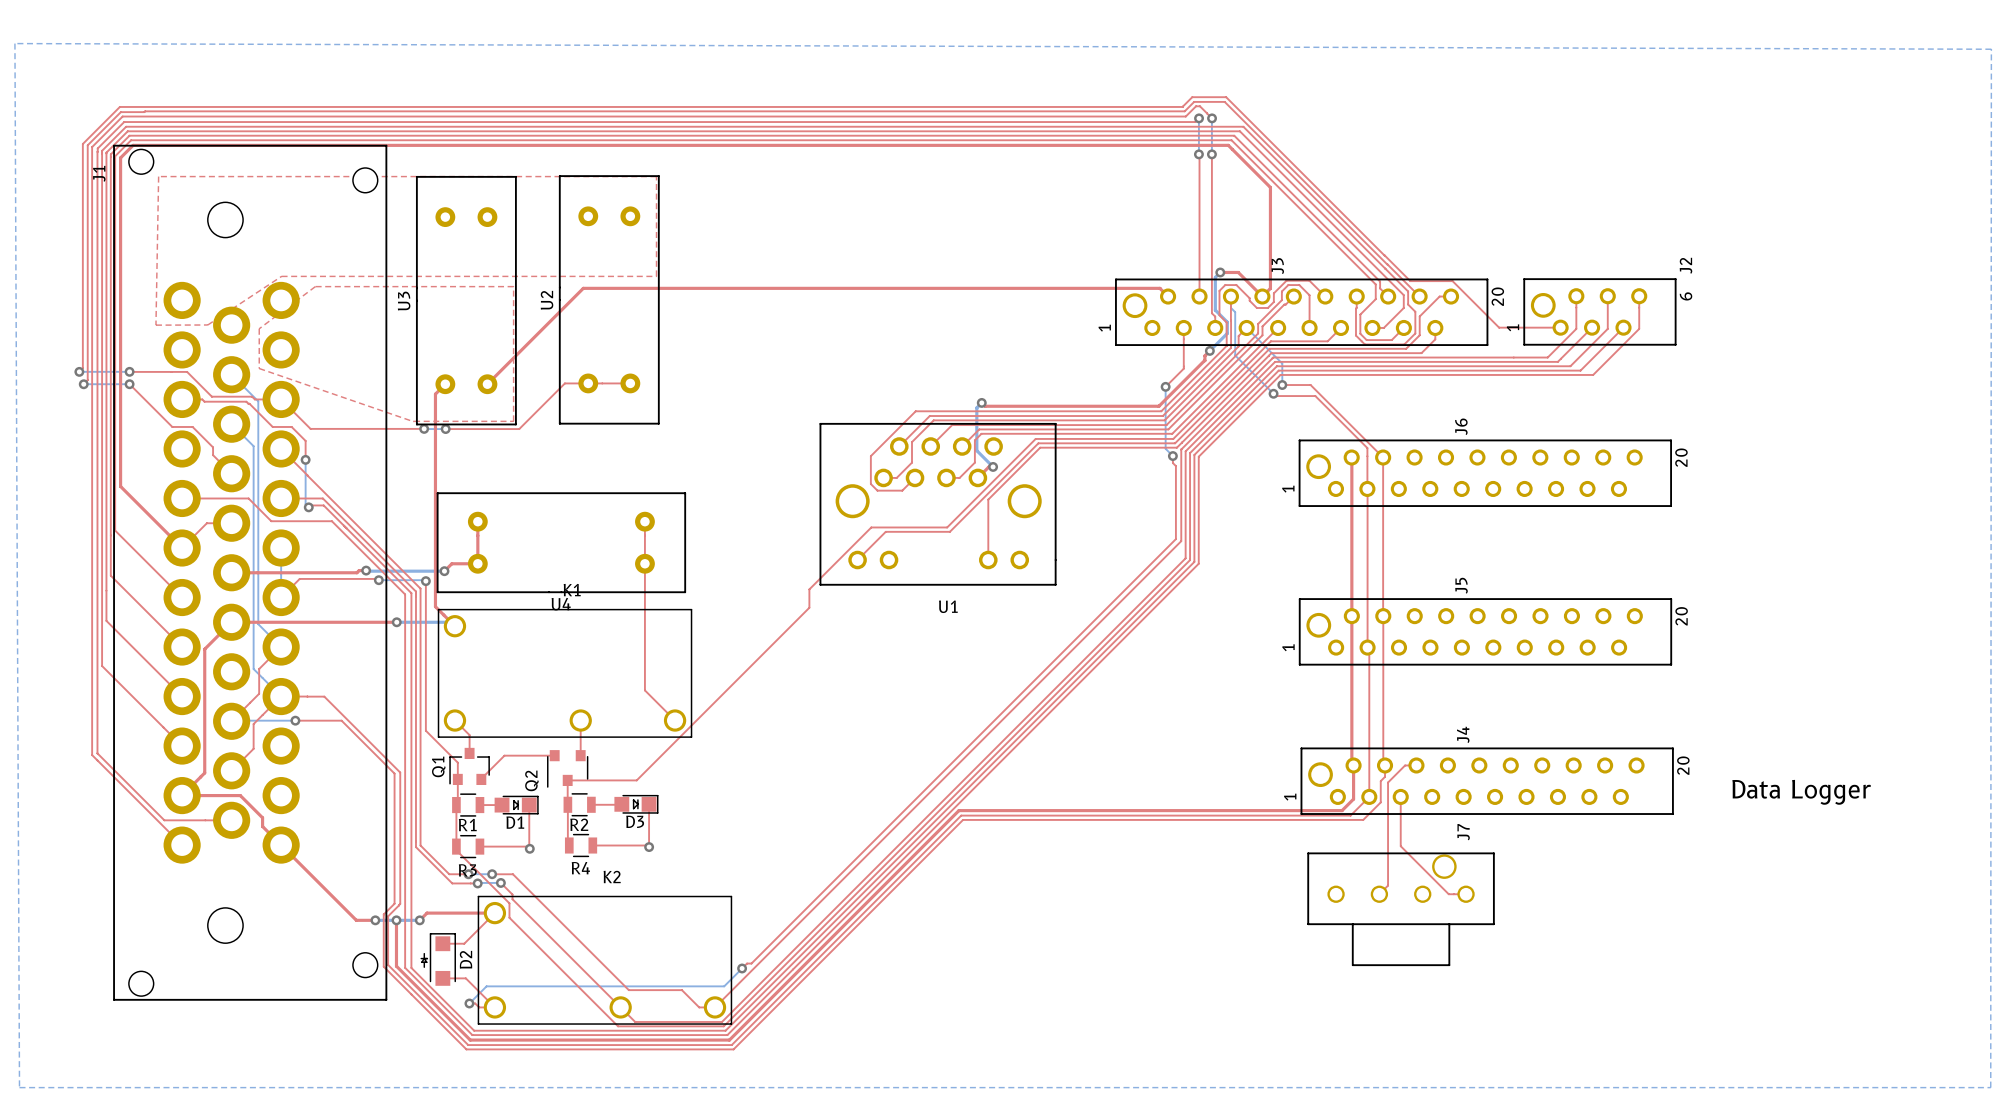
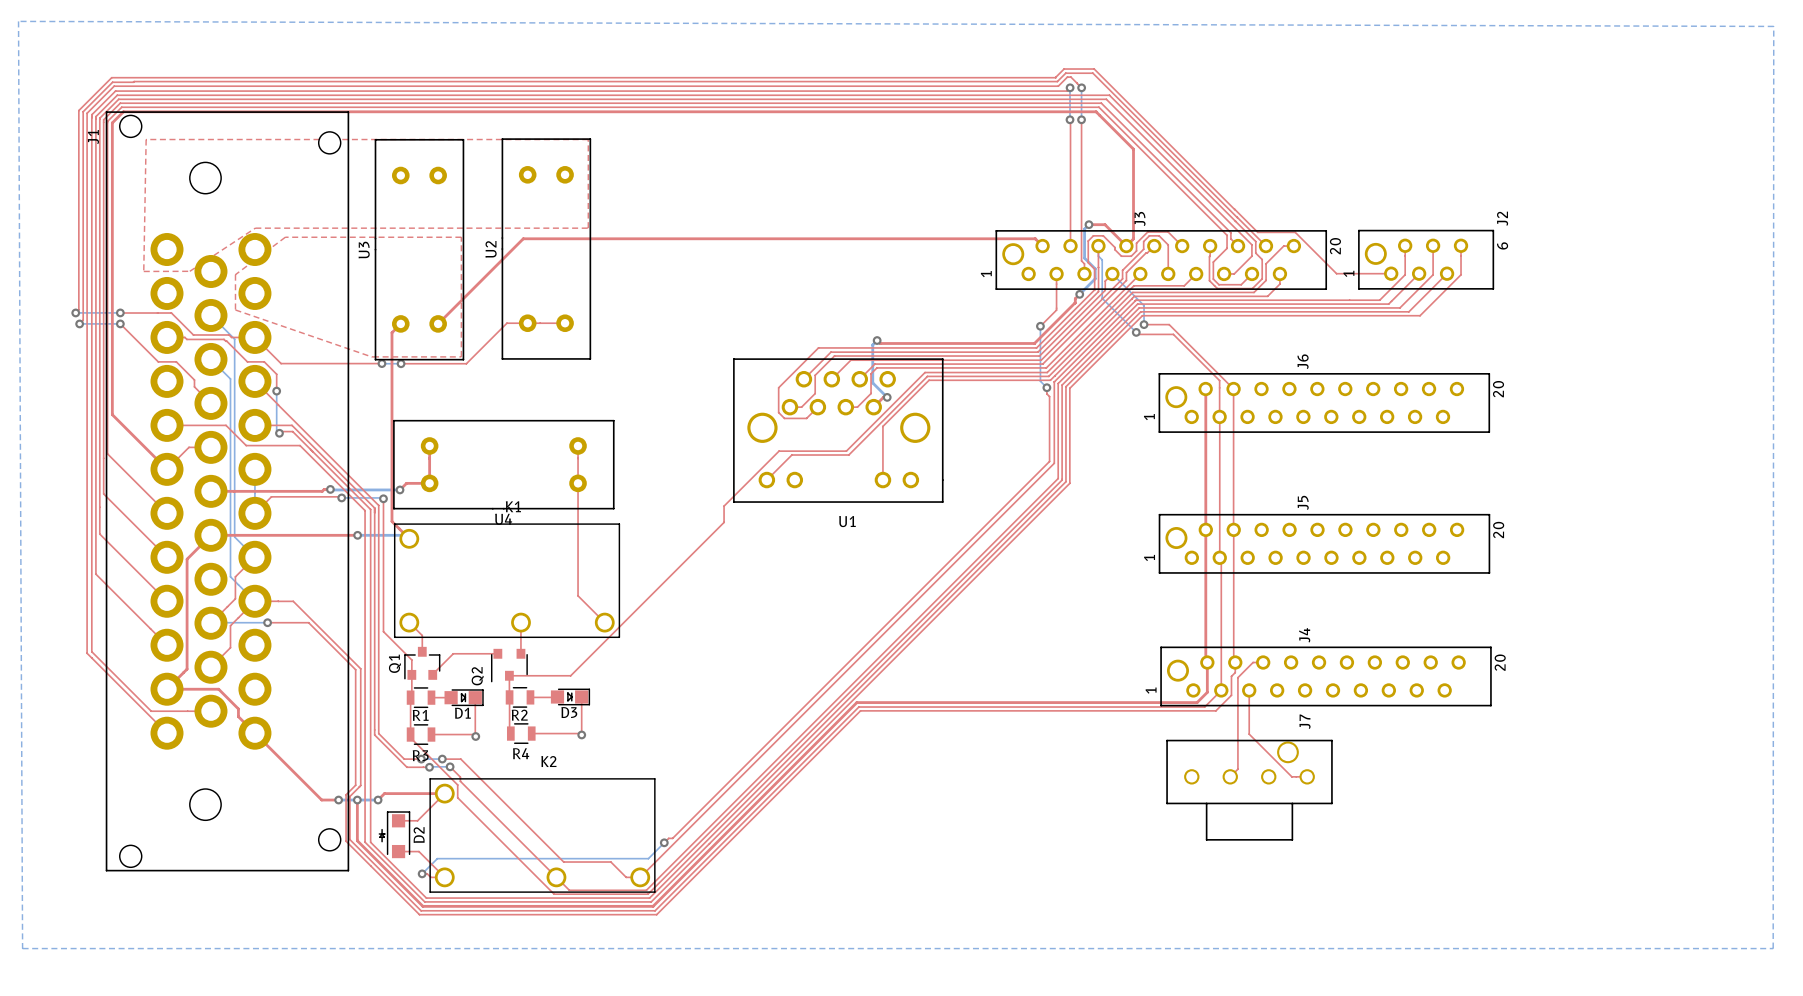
text: Data Logger (1801, 792) -> none

